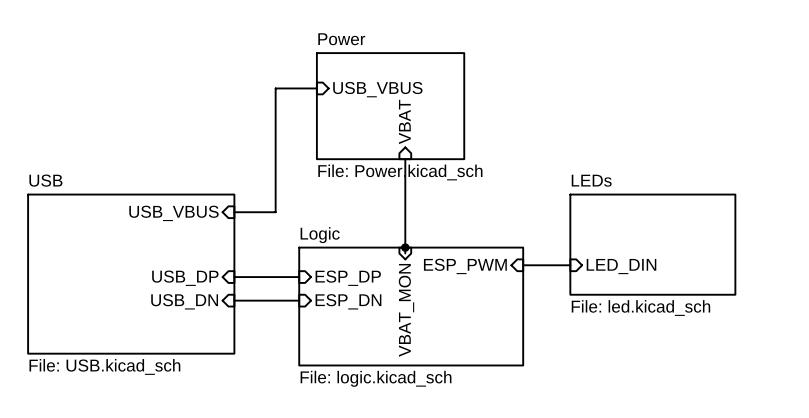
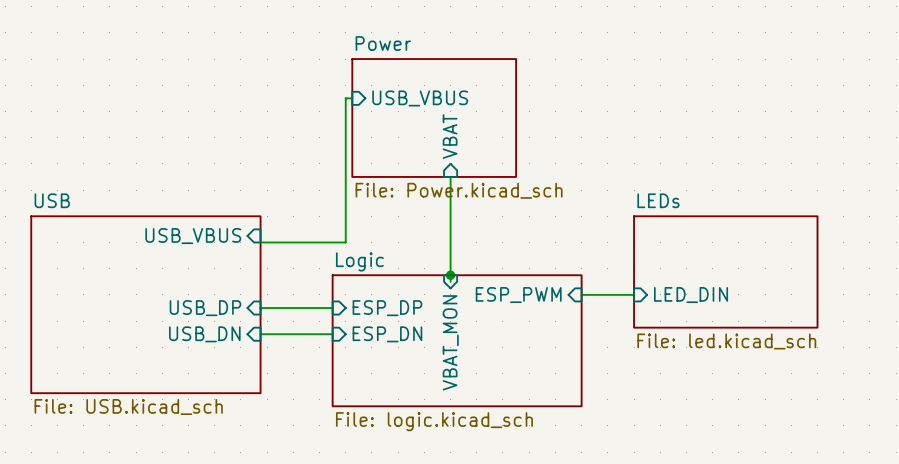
wire: (311, 88) (275, 88) (275, 212) (234, 212) -> (345, 98) (345, 242) (260, 242)

